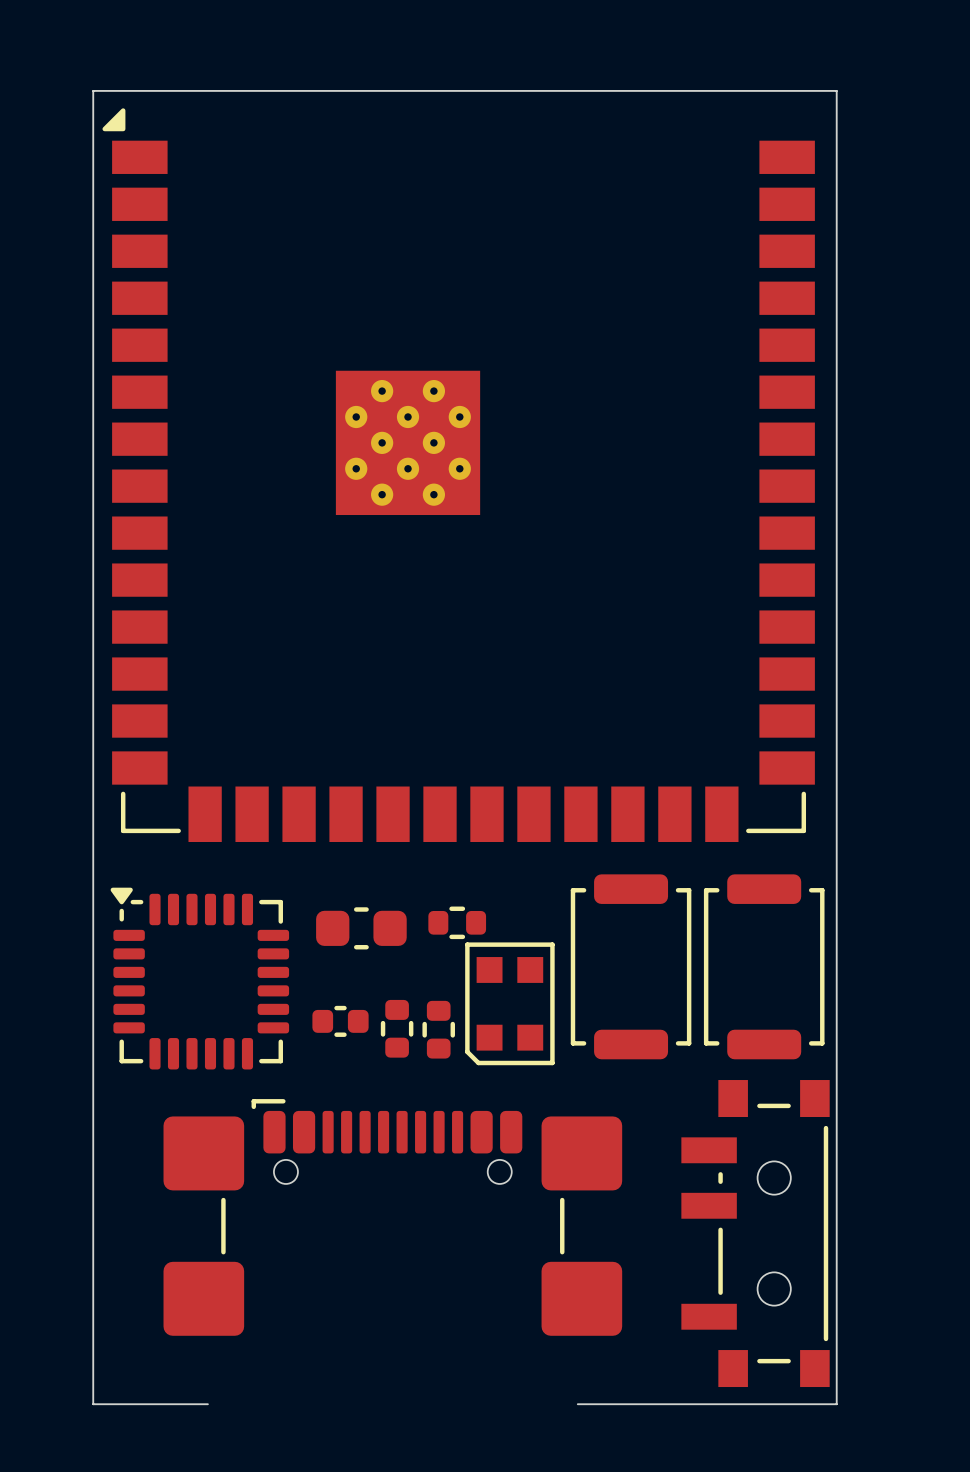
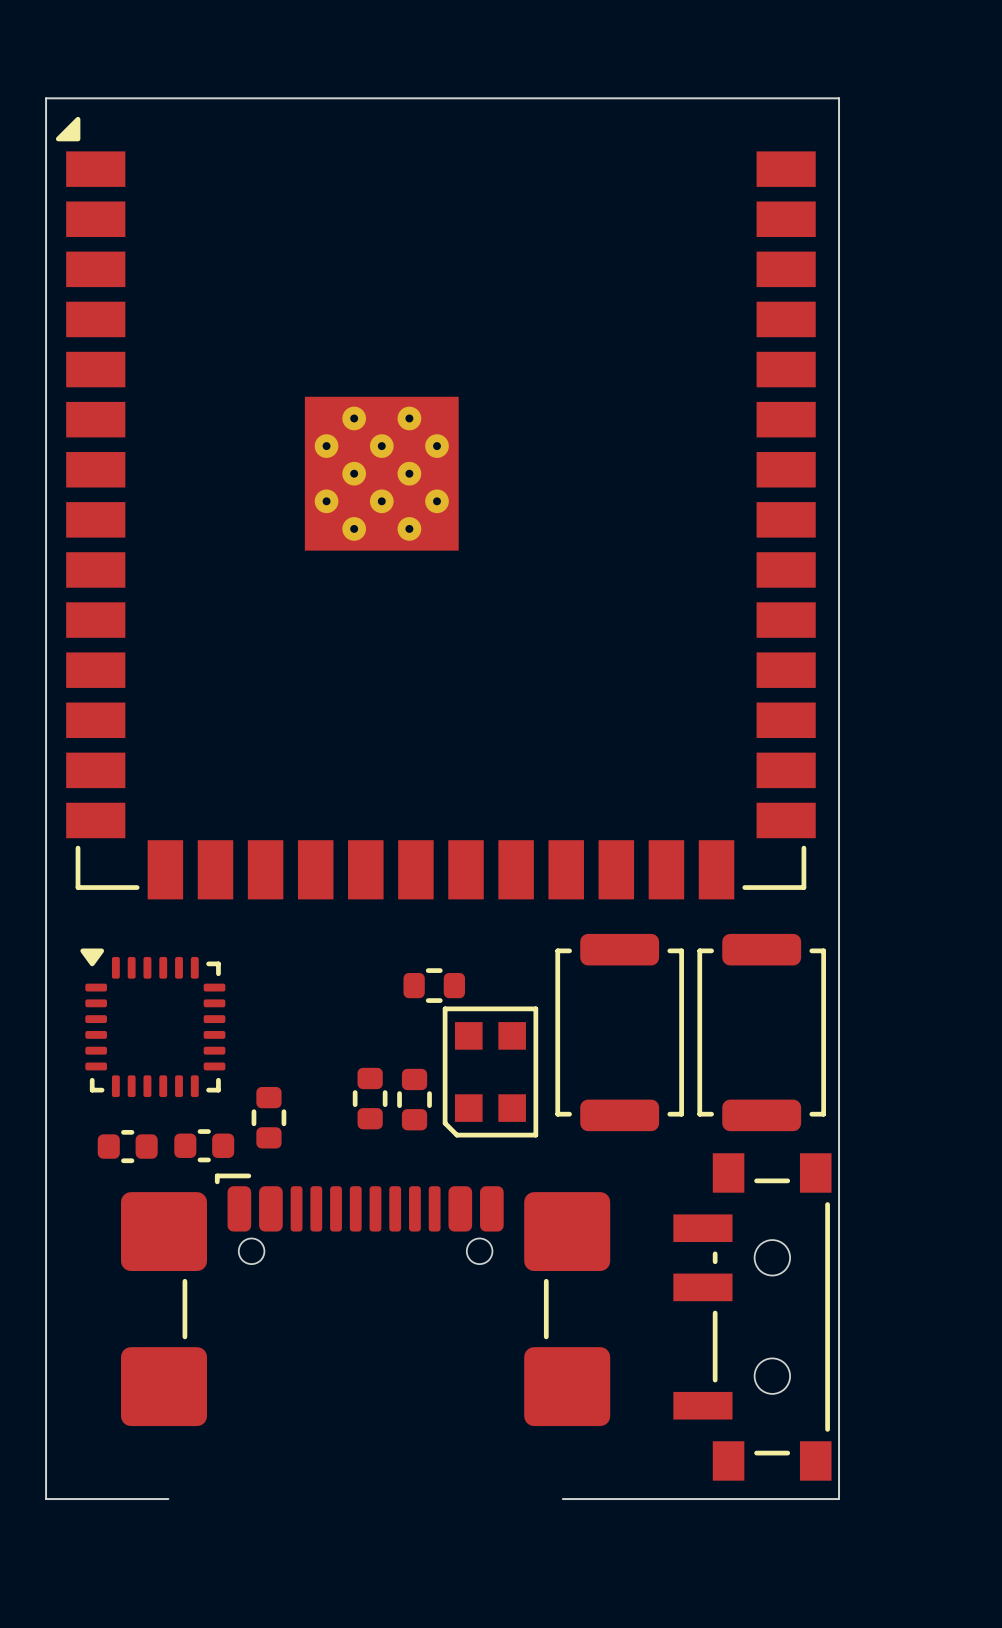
part footprint: [110, 887, 290, 1070] -> [80, 948, 226, 1098]
part: (361, 928) -> none
part: (340, 1021) -> none
part: none -> (268, 1117)
part: none -> (204, 1145)
part: none -> (127, 1146)

